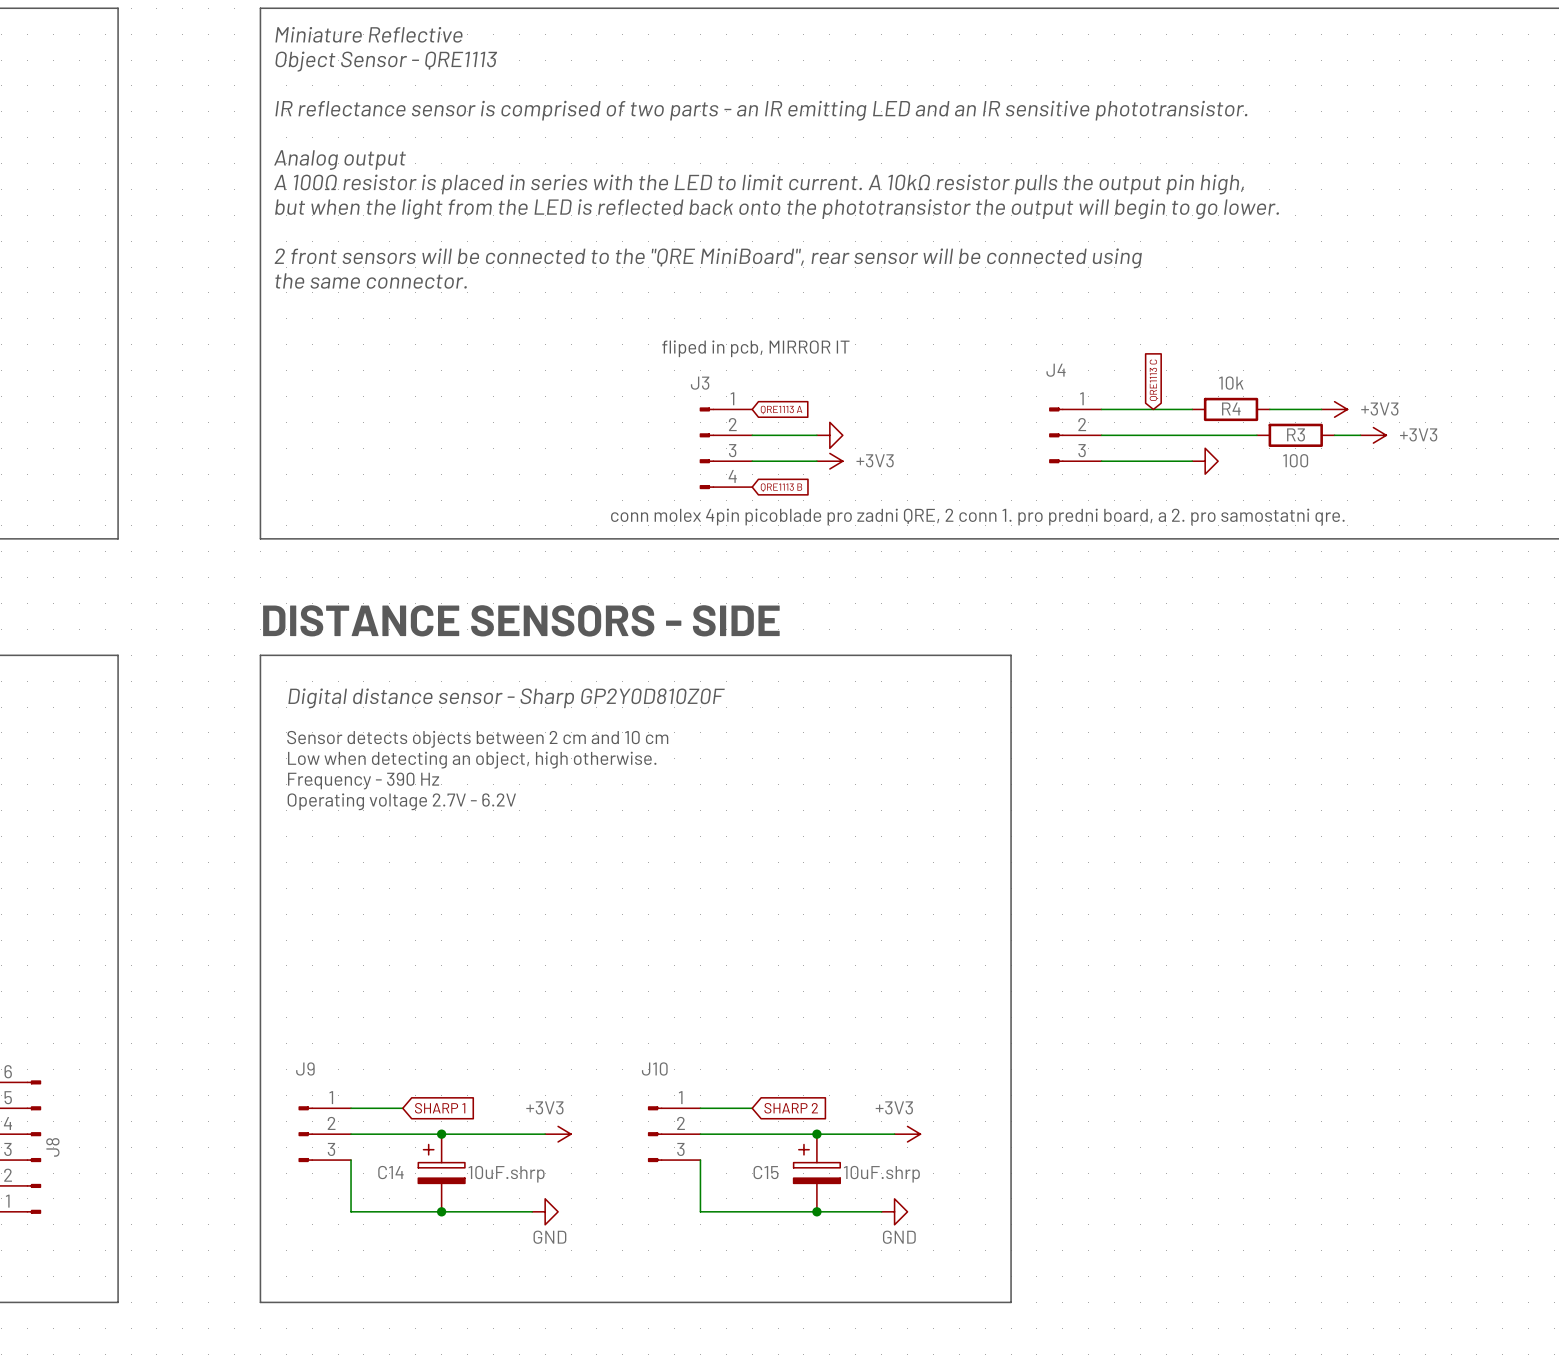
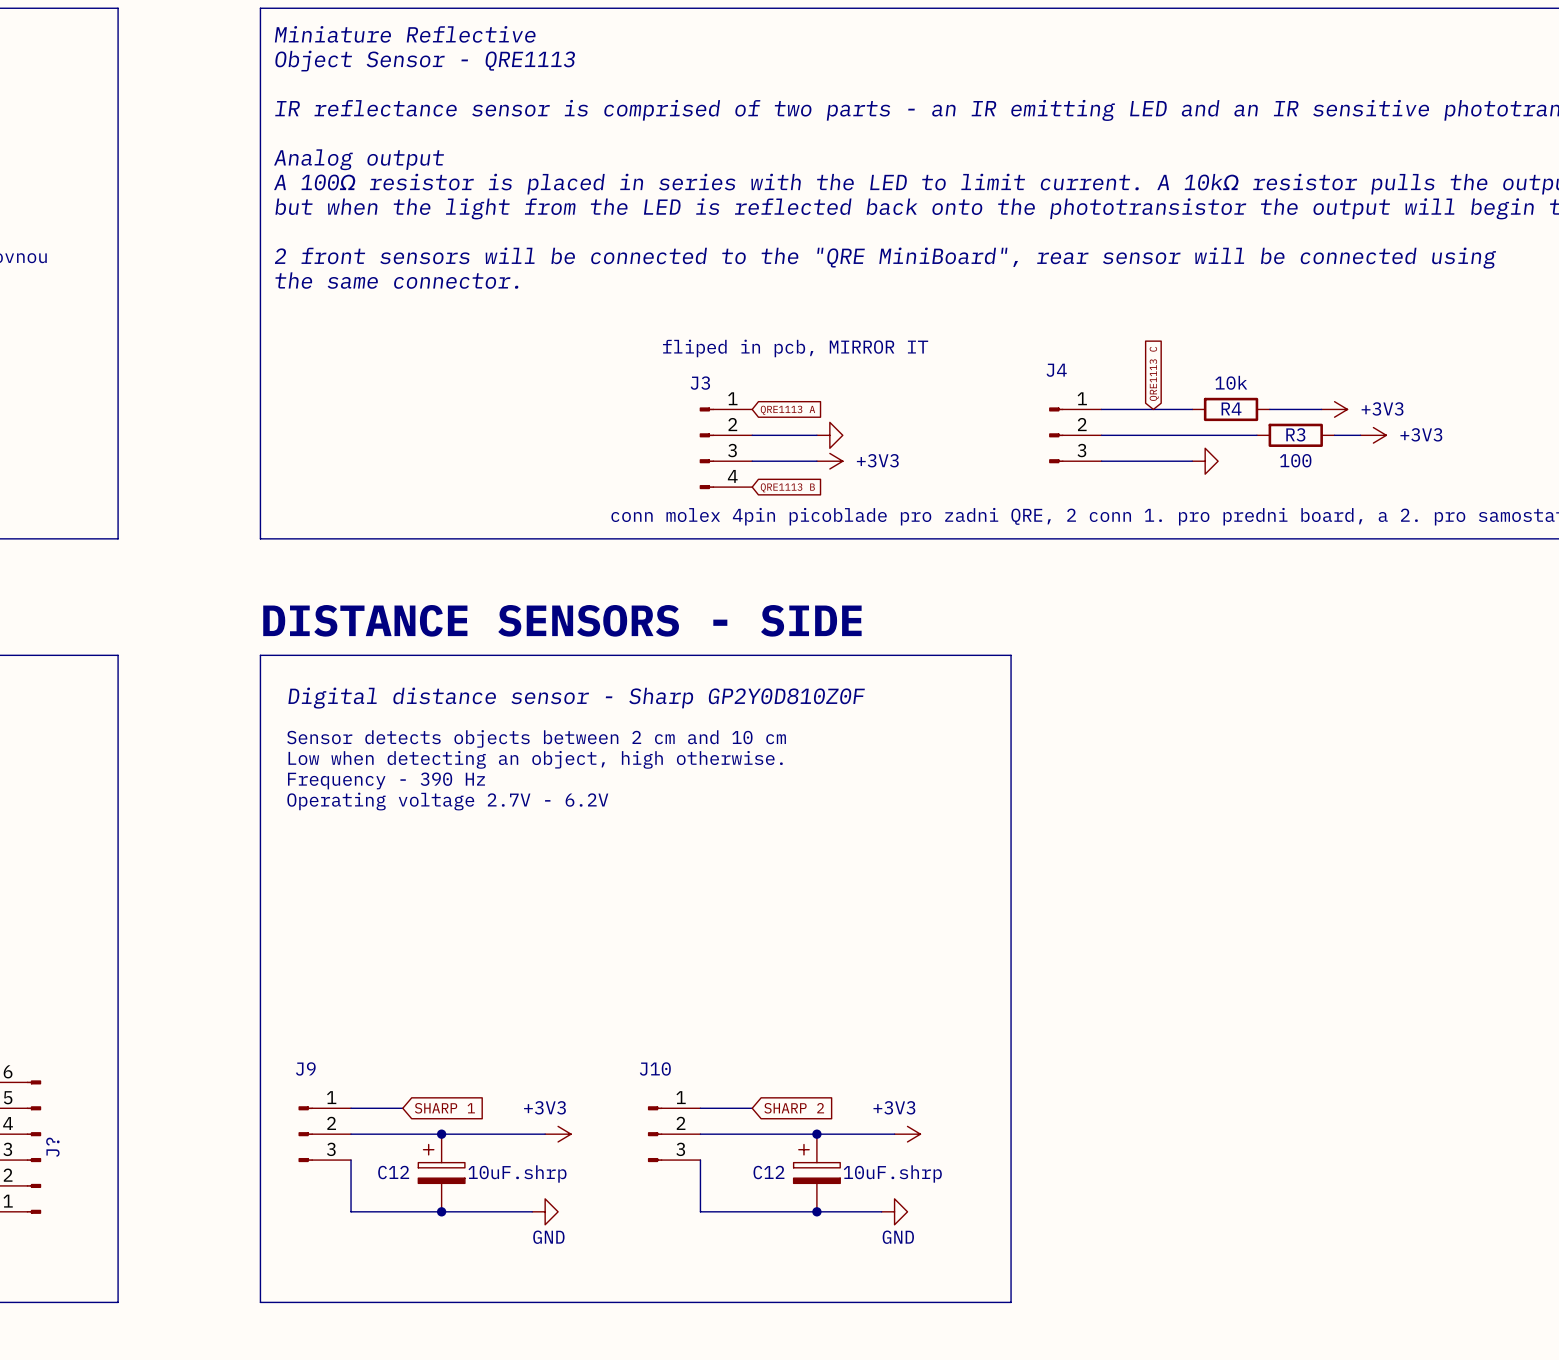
J8 name: J8 (52, 1147) -> J? (52, 1147)
C14 name: C14 (390, 1172) -> C12 (393, 1172)
C15 name: C15 (766, 1172) -> C12 (768, 1172)

